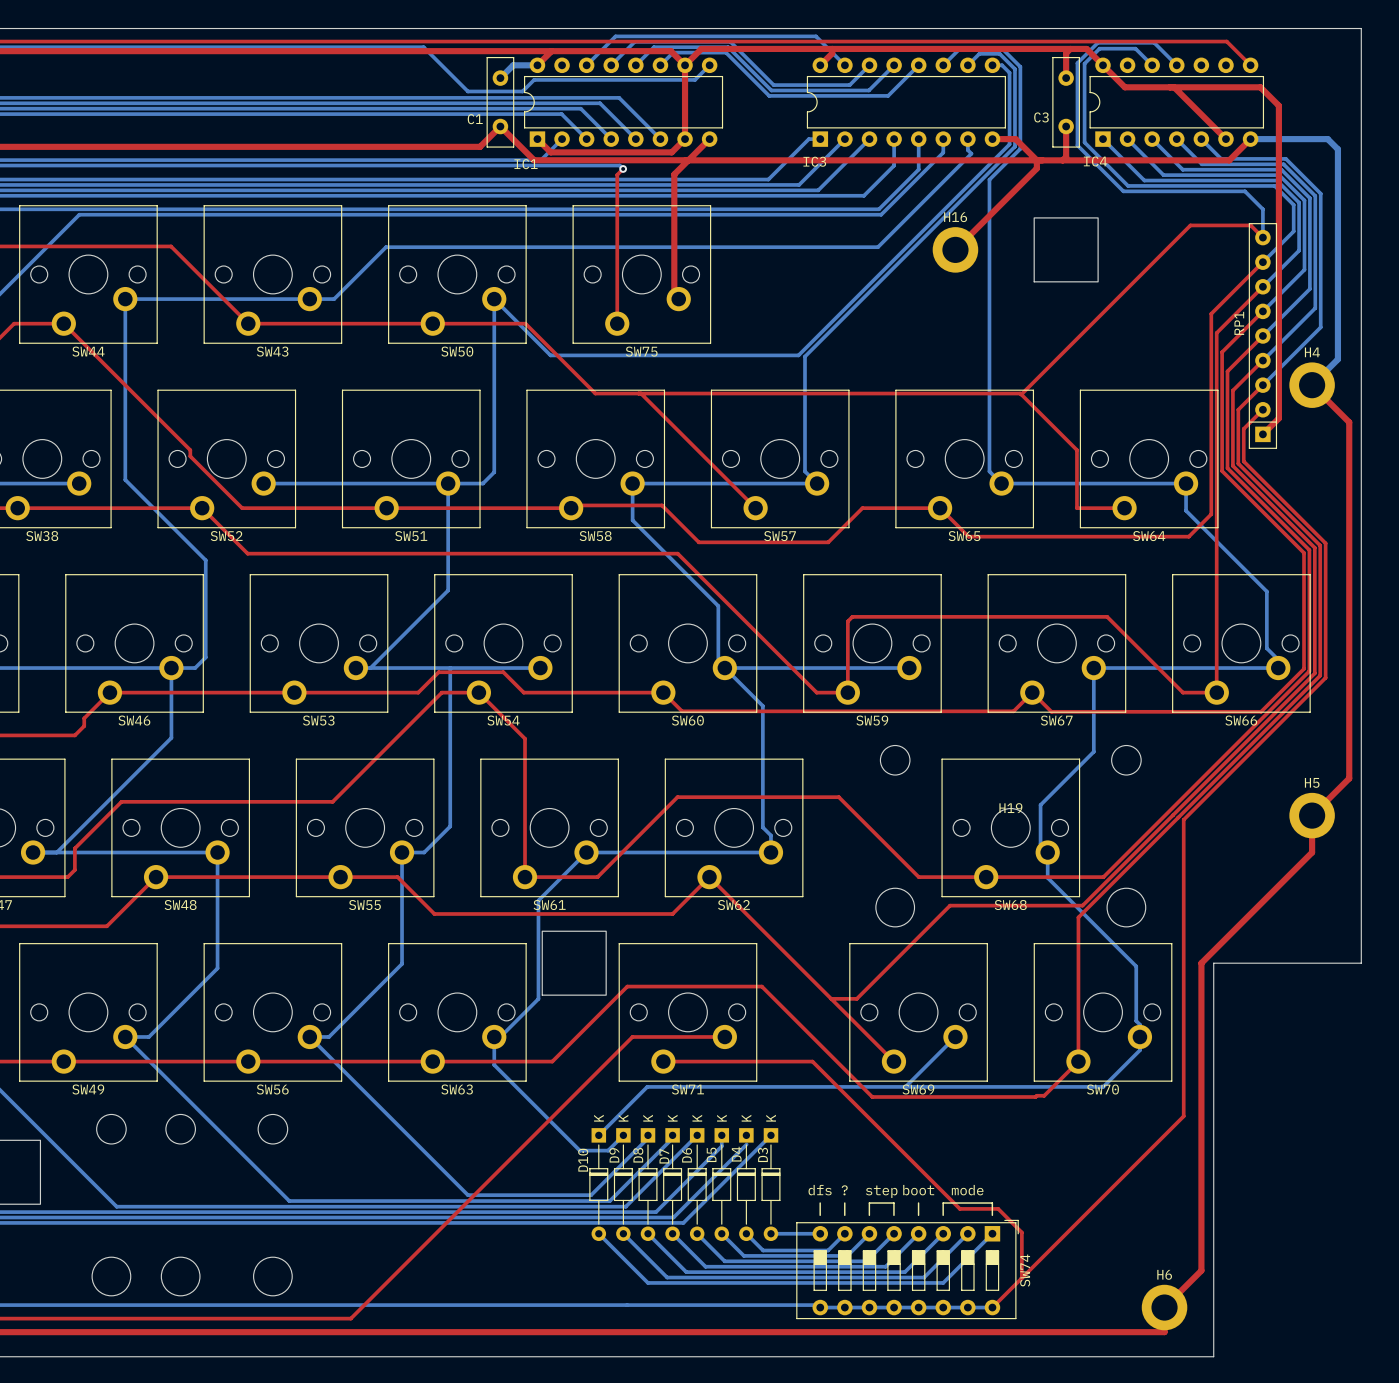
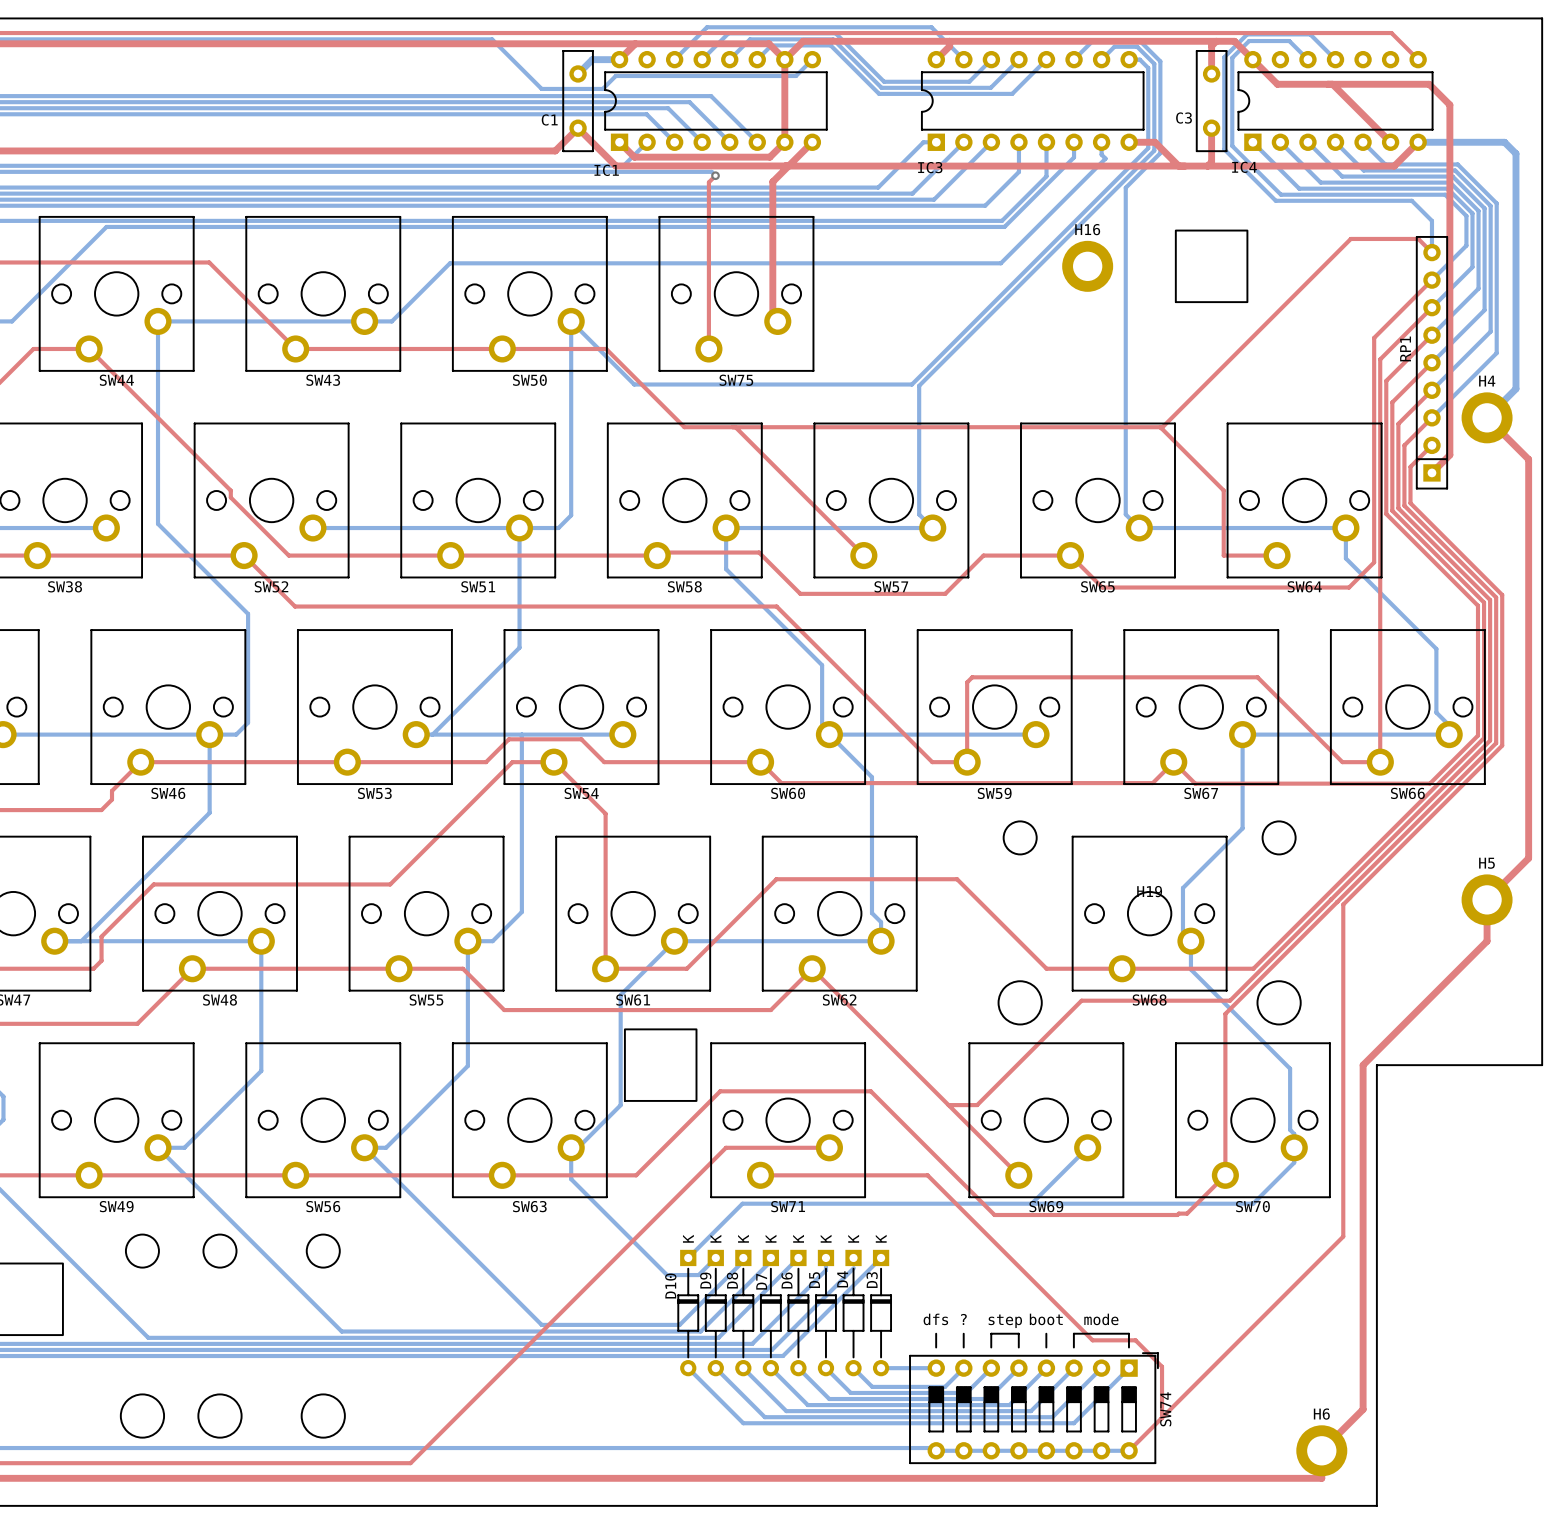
top track: (1036, 160) (1036, 168) (955, 249) -> none

